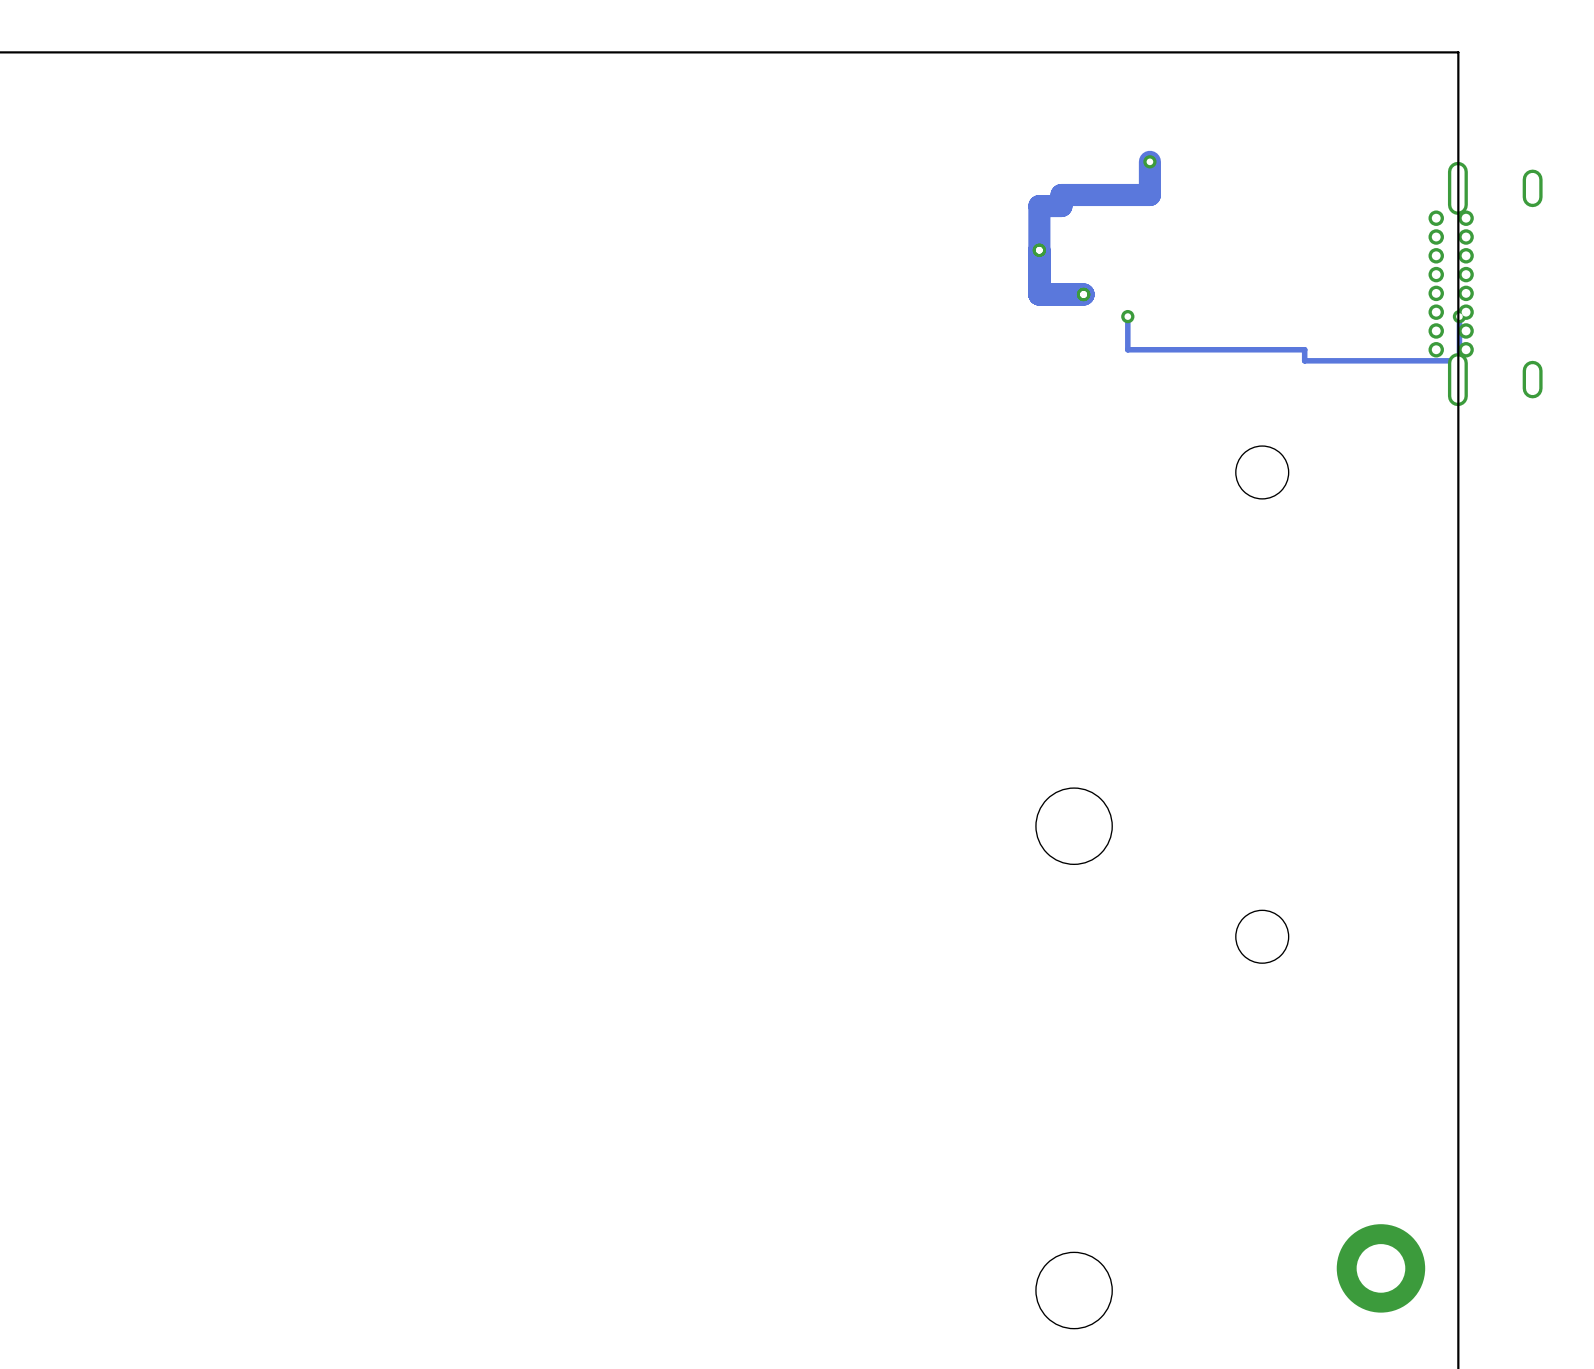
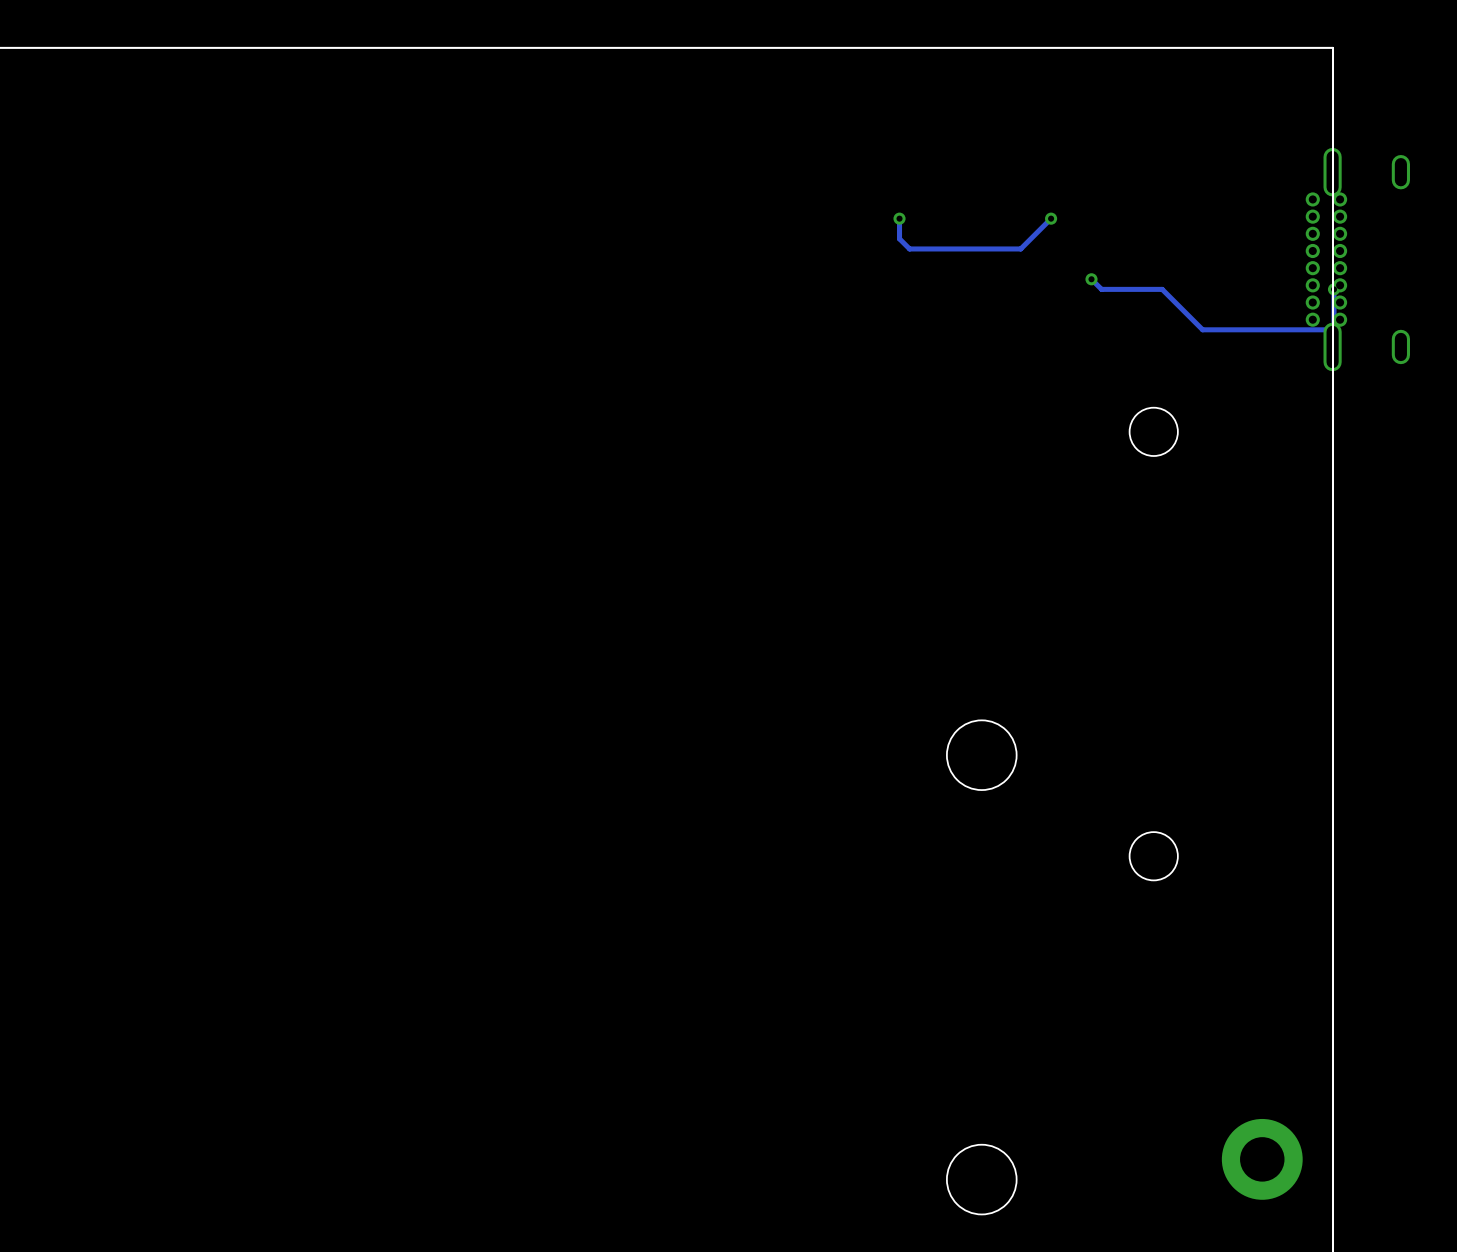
track: (1149, 161) (1149, 195) (1061, 195) (1061, 206) (1039, 206) (1039, 294) (1083, 294) -> none
via: (1149, 161) -> none
via: none -> (899, 218)
track: none -> (1051, 218) (1020, 248) (909, 248) (899, 238) (899, 218)
via: none -> (1051, 218)
via: (1039, 250) -> none
via: (1083, 294) -> none
via: none -> (1091, 279)
track: (1127, 316) (1127, 349) (1304, 349) (1304, 360) (1315, 360) -> (1091, 279) (1101, 289) (1162, 289) (1202, 329)
via: (1127, 316) -> none

